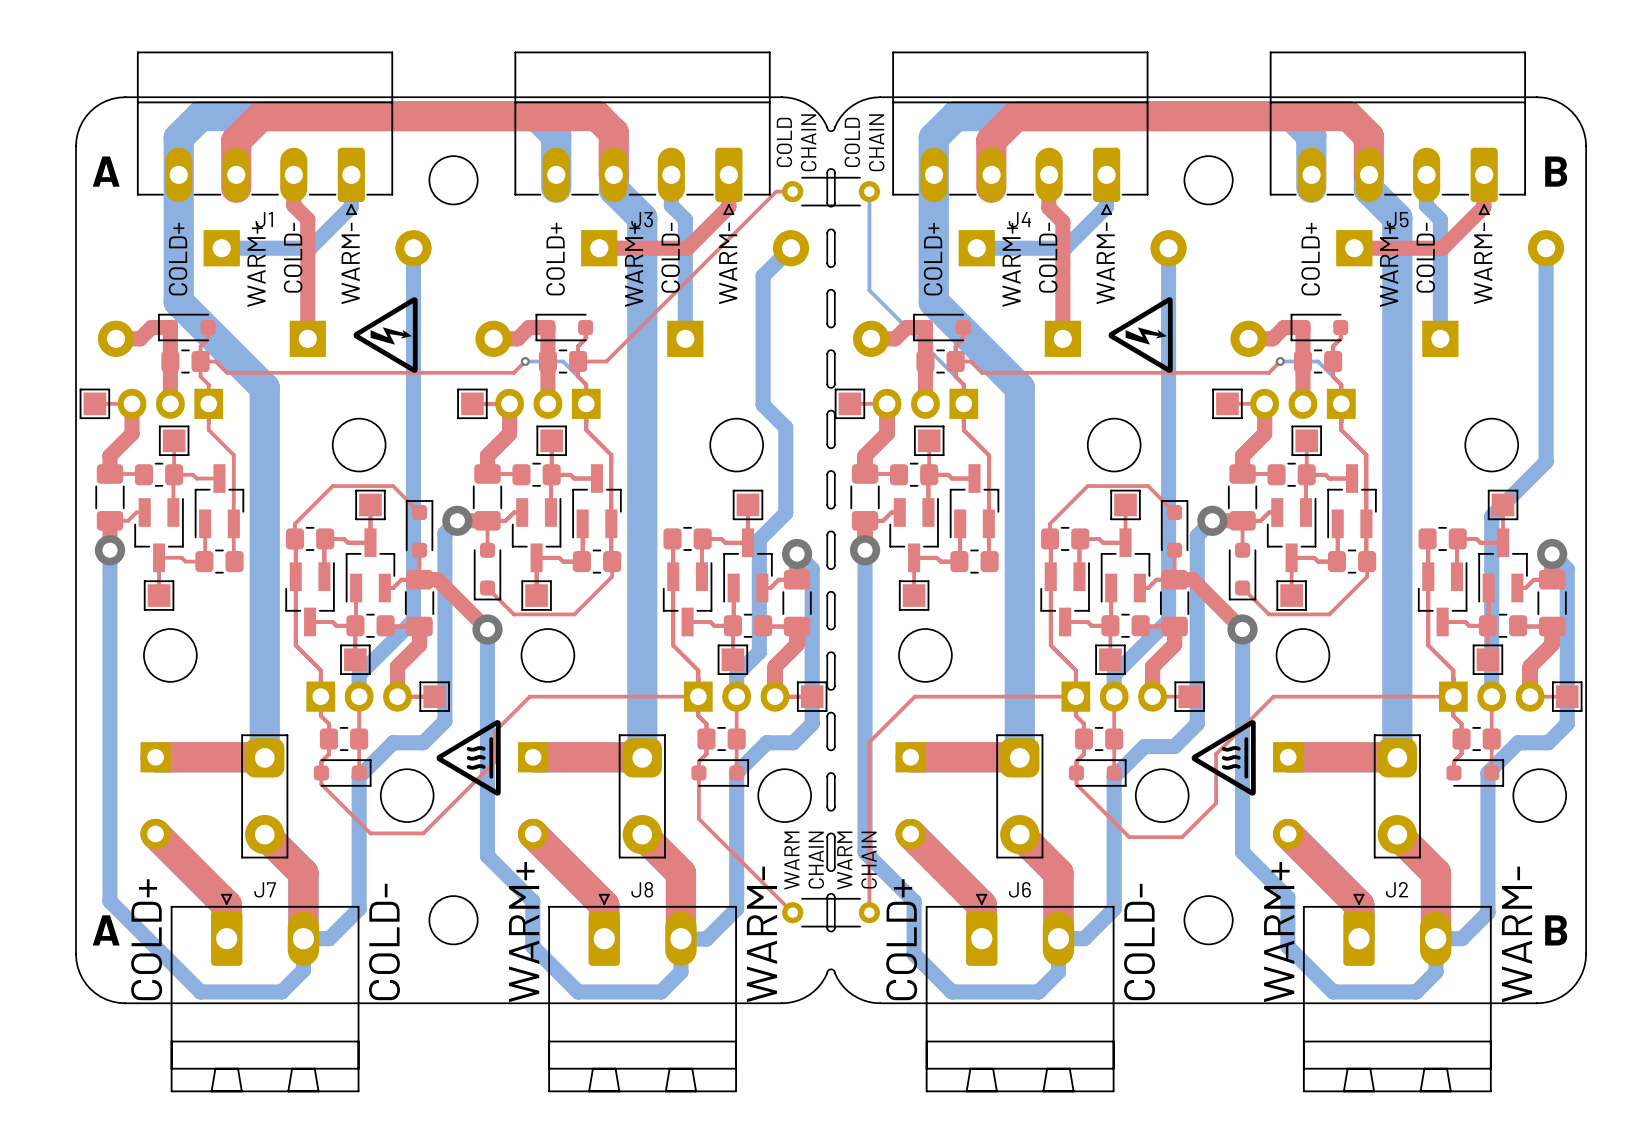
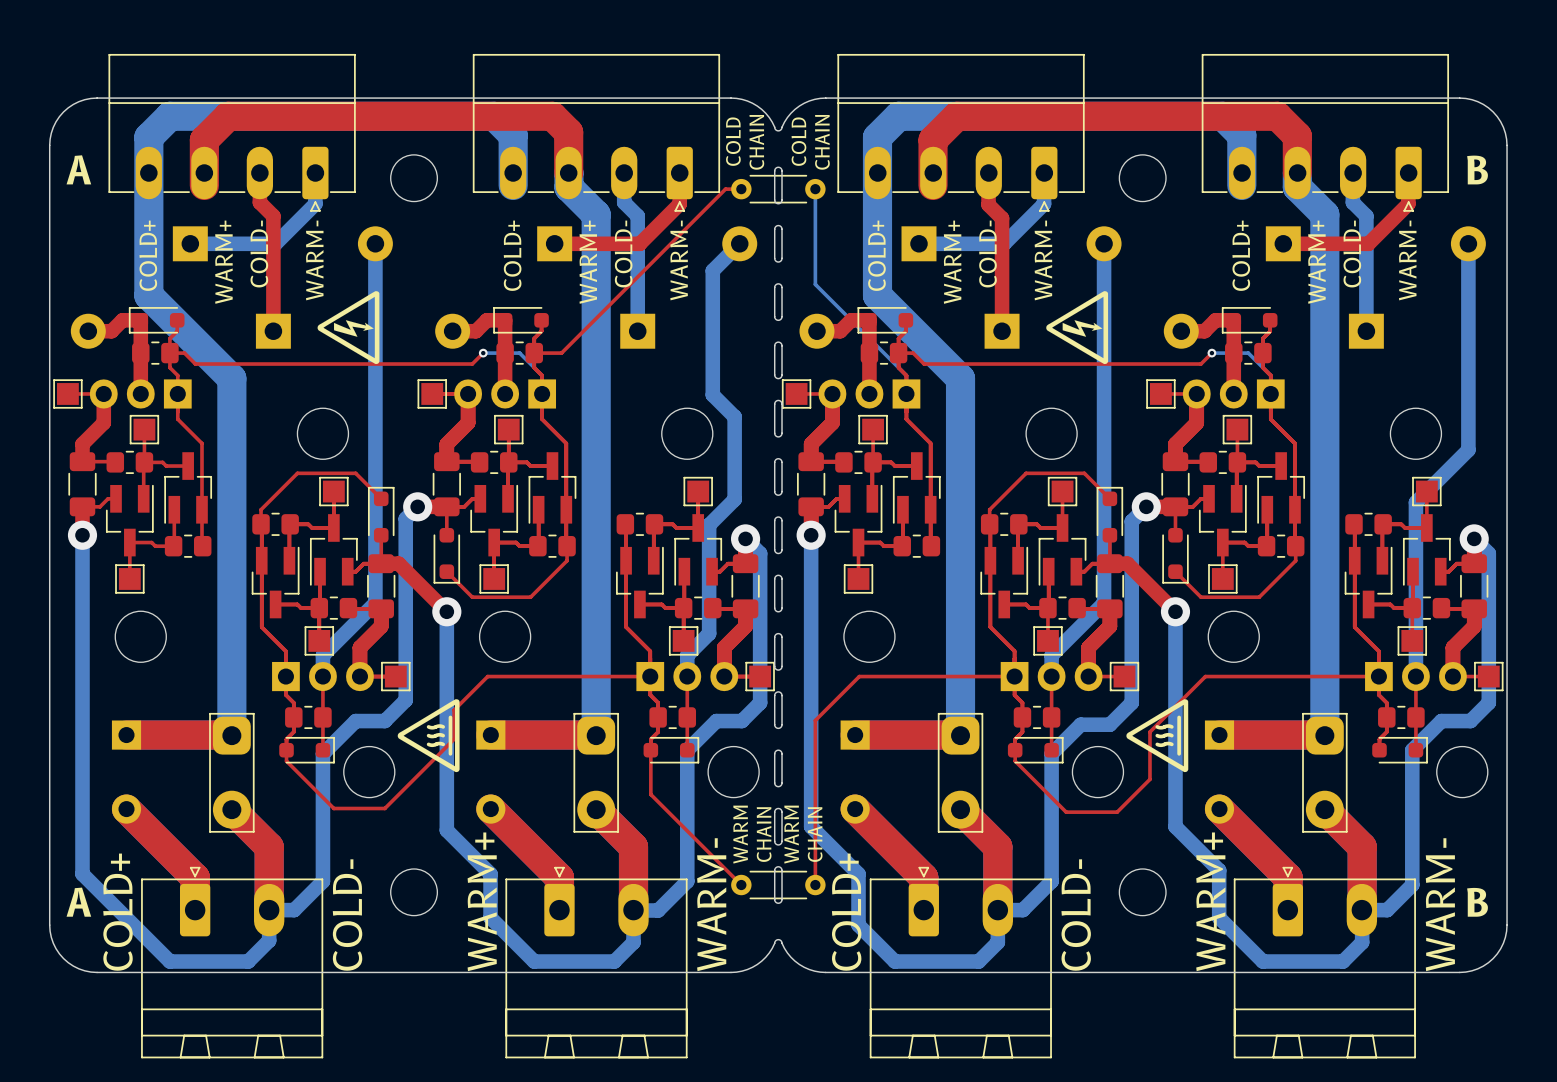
J1 name: J1 (264, 219) -> none
J3 name: J3 (642, 219) -> none
J4 name: J4 (1019, 219) -> none
J5 name: J5 (1397, 219) -> none
J7 name: J7 (265, 889) -> none
J8 name: J8 (642, 889) -> none
J6 name: J6 (1019, 889) -> none
J2 name: J2 (1397, 889) -> none

